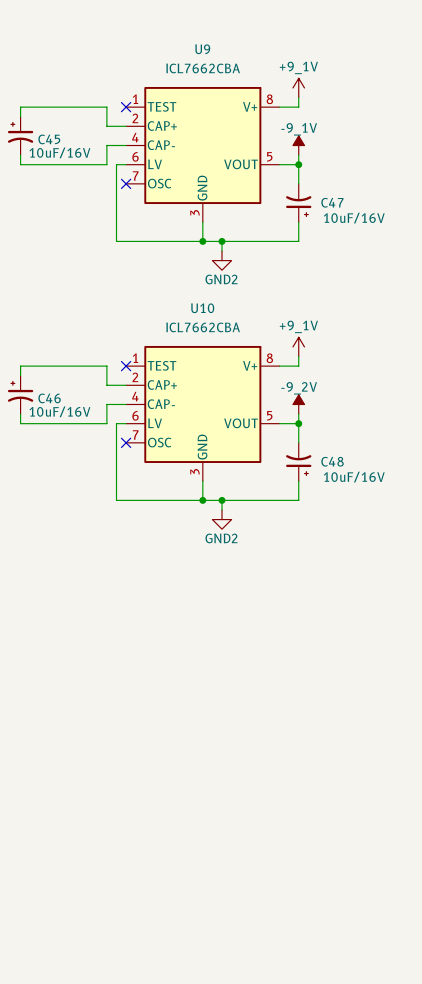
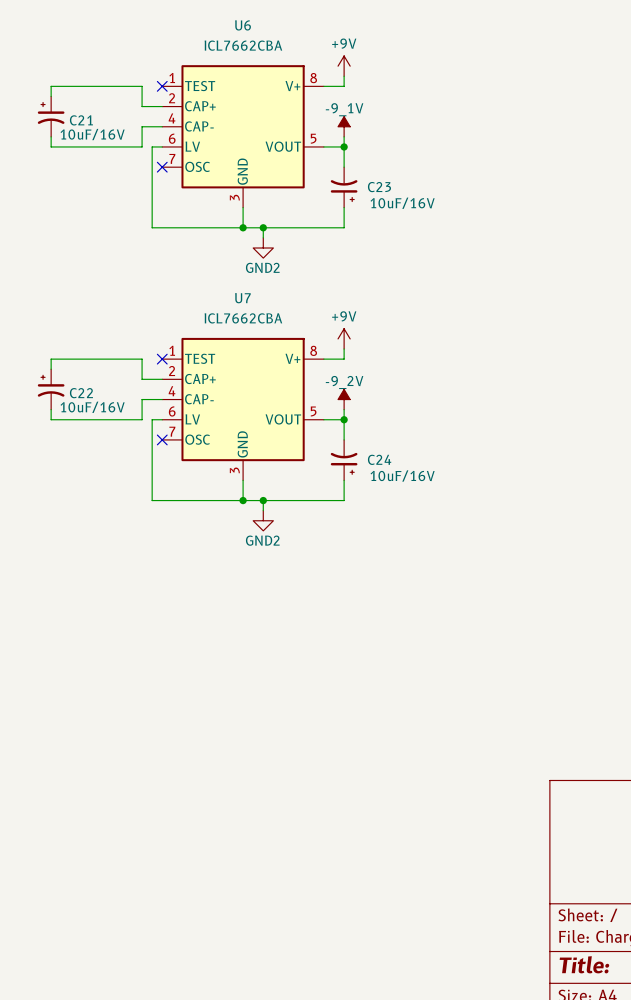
U9 name: U9 (202, 49) -> U6 (243, 25)
power symbol: +9_1V (298, 87) -> +9V (344, 66)
C45 name: C45 (49, 139) -> C21 (81, 120)
C47 name: C47 (332, 202) -> C23 (379, 187)
U10 name: U10 (202, 308) -> U7 (242, 298)
power symbol: +9_1V (298, 346) -> +9V (344, 338)
C46 name: C46 (49, 398) -> C22 (81, 393)
C48 name: C48 (332, 461) -> C24 (379, 459)

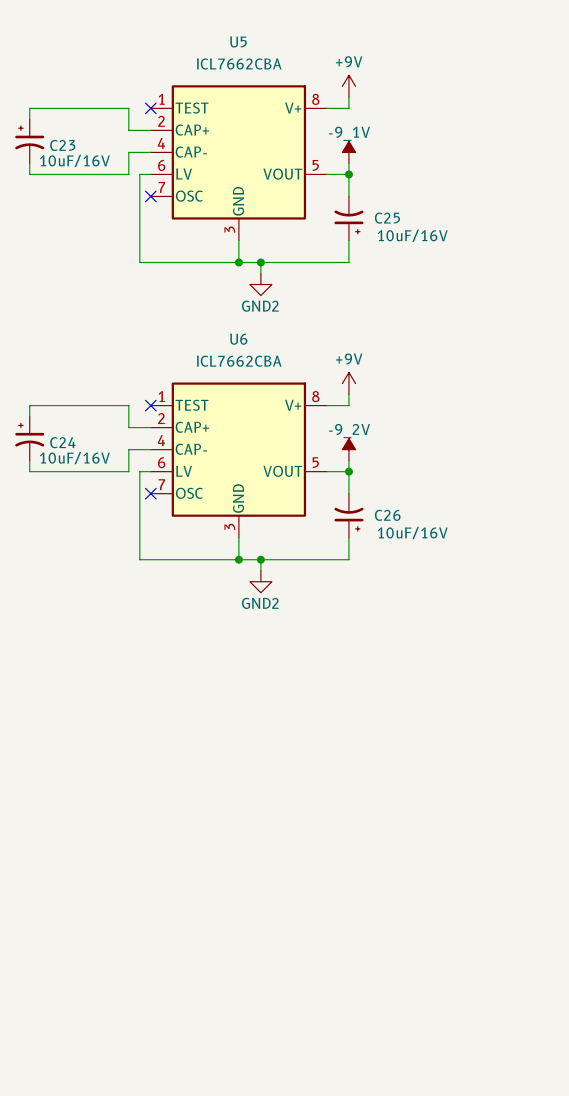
U6 name: U6 (243, 25) -> U5 (238, 41)
C21 name: C21 (81, 120) -> C23 (62, 145)
C23 name: C23 (379, 187) -> C25 (387, 218)
U7 name: U7 (242, 298) -> U6 (238, 339)
C22 name: C22 (81, 393) -> C24 (62, 442)
C24 name: C24 (379, 459) -> C26 (387, 515)

